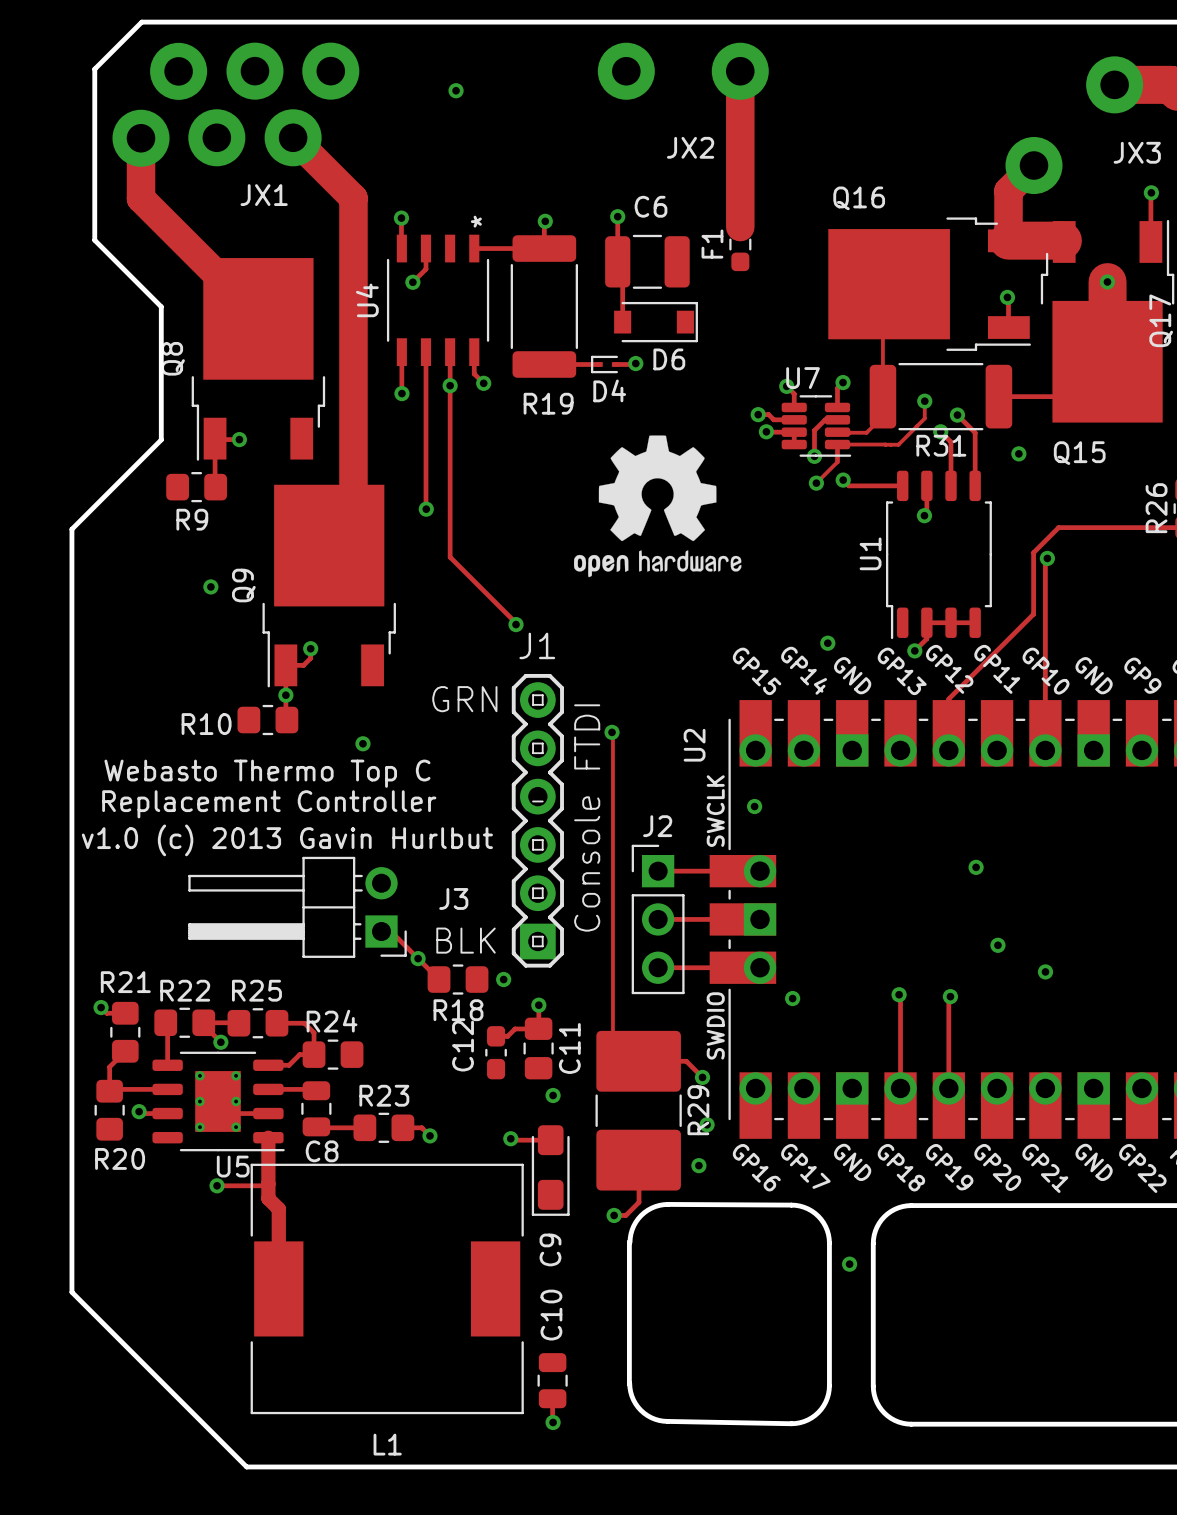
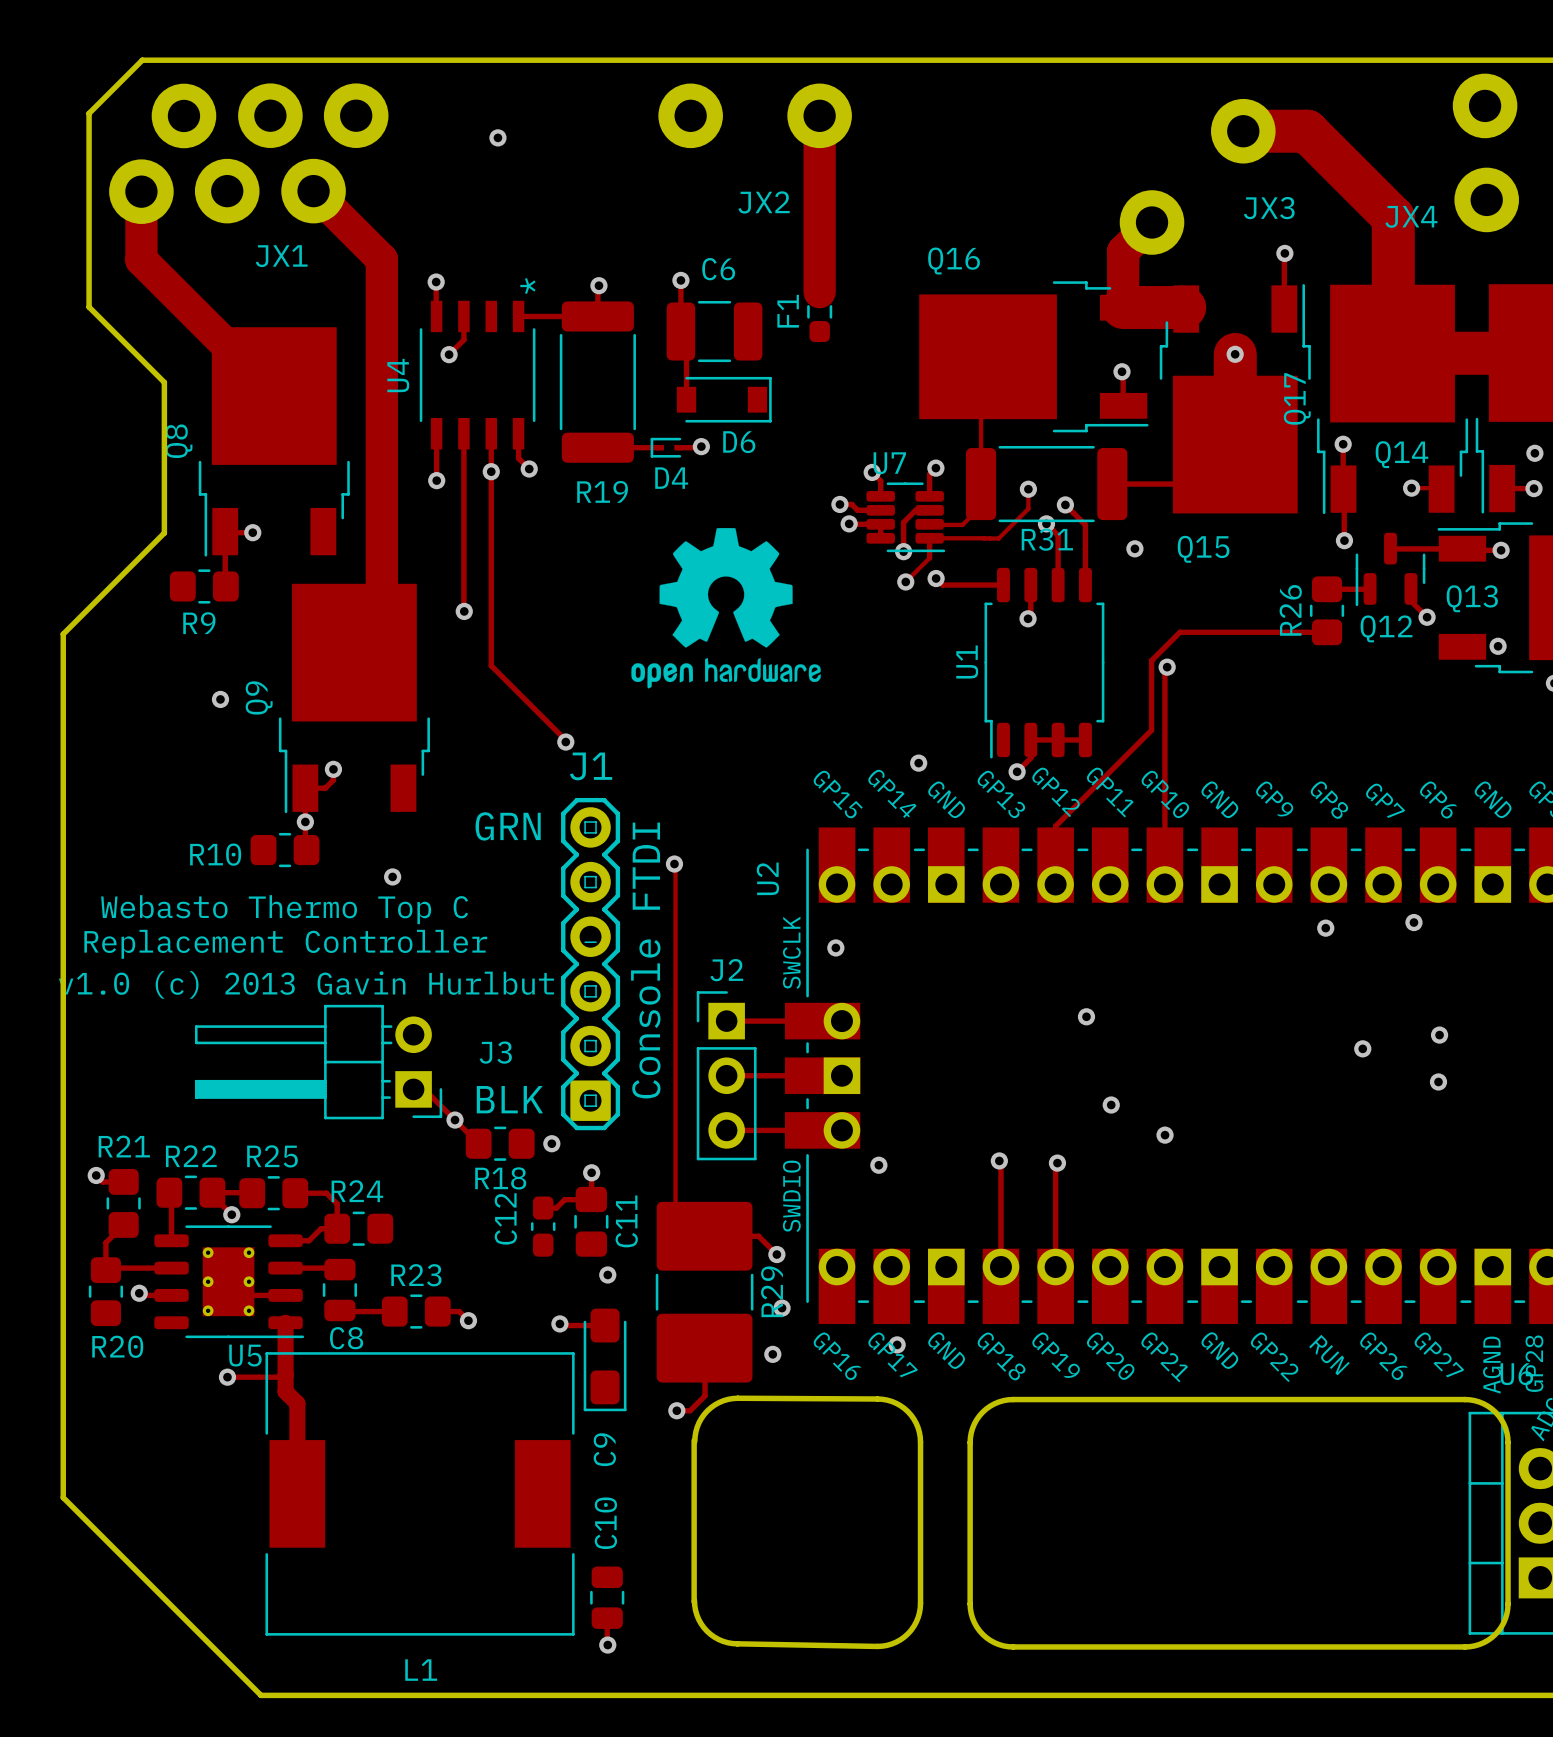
via: none -> (897, 1344)
via: (849, 1264) -> none

